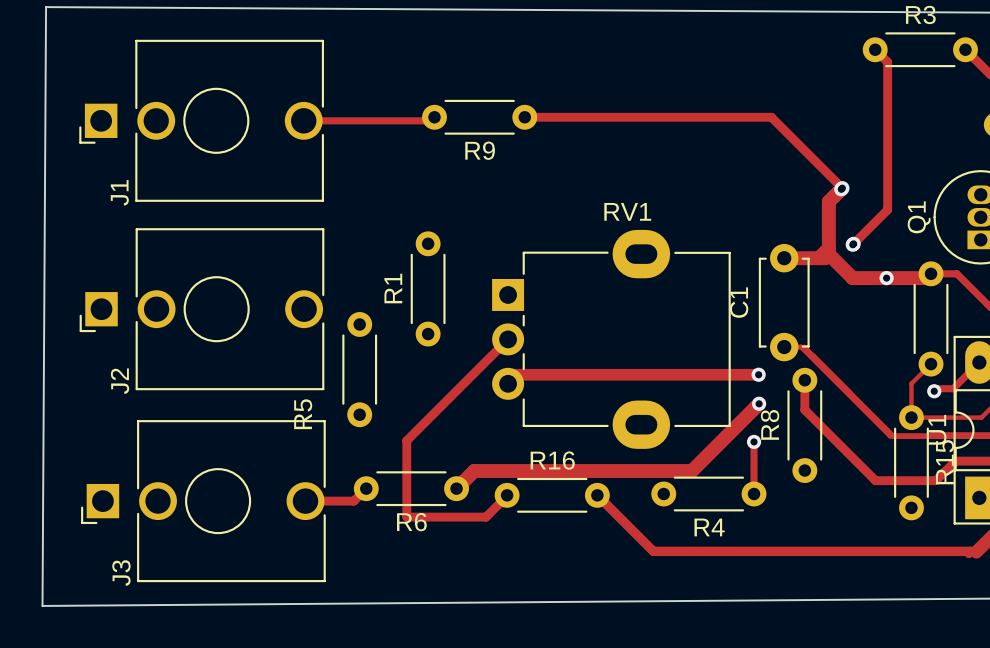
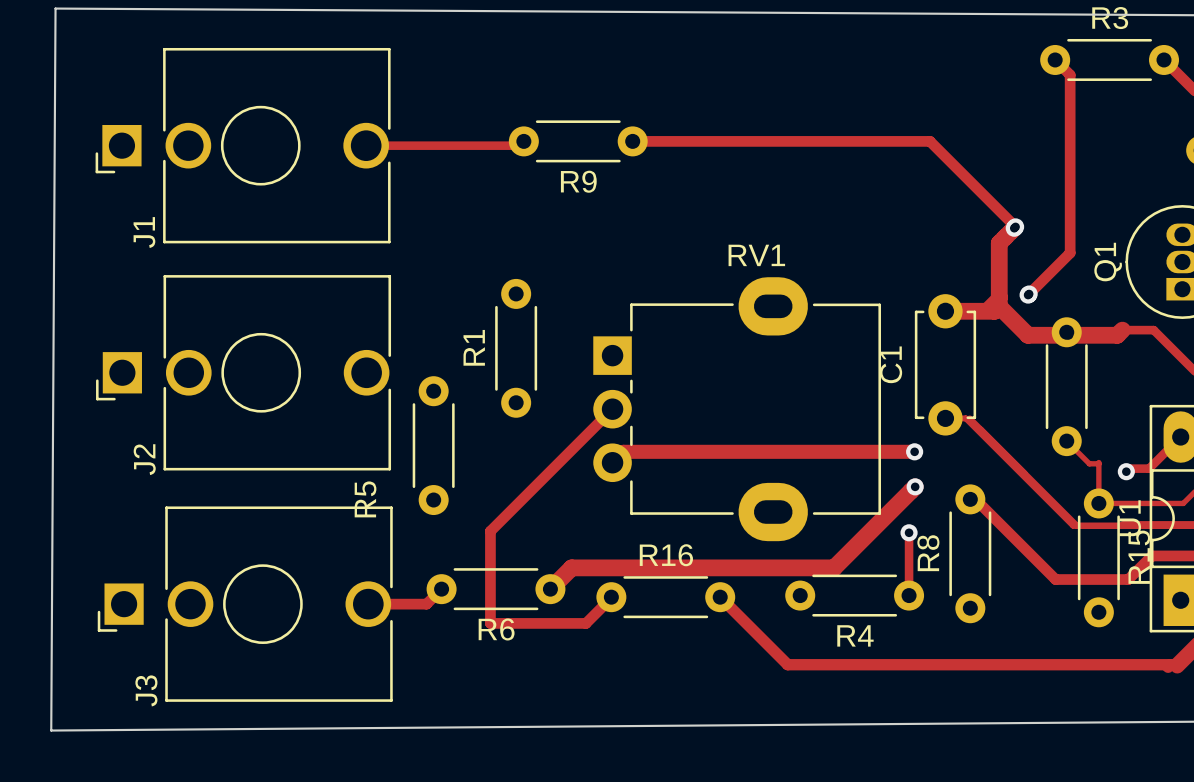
part position: (931, 318) -> (1066, 386)
track: (931, 364) (911, 383) -> none
track: none -> (1066, 441) (1089, 463) (1098, 463)
track: (804, 380) (804, 409) -> none
R8 position: (804, 425) -> (970, 553)

